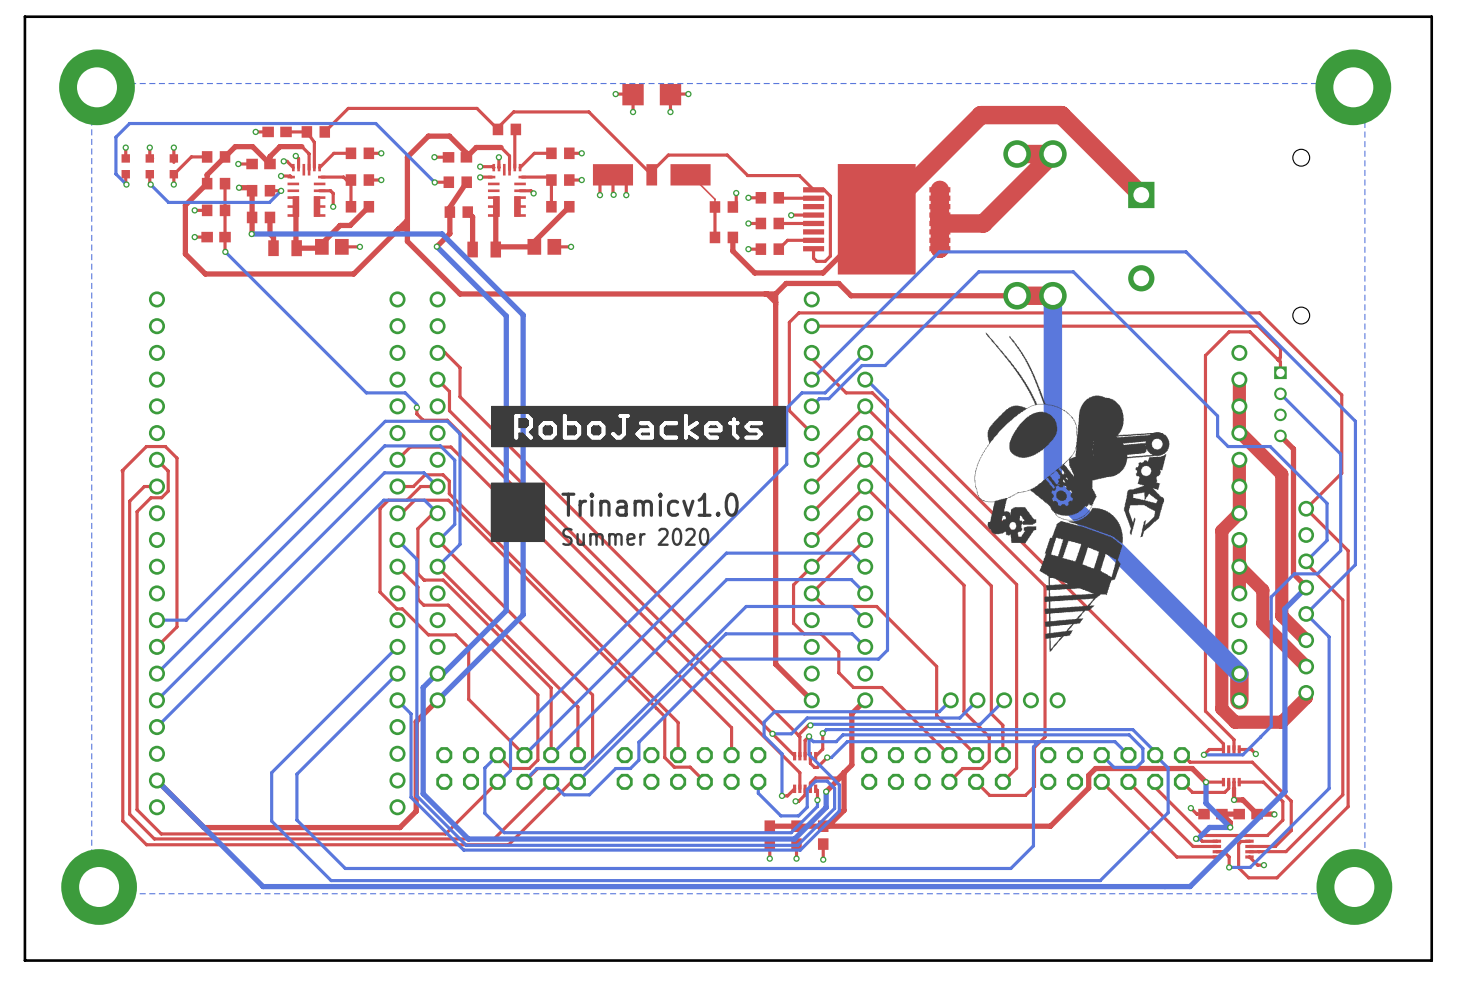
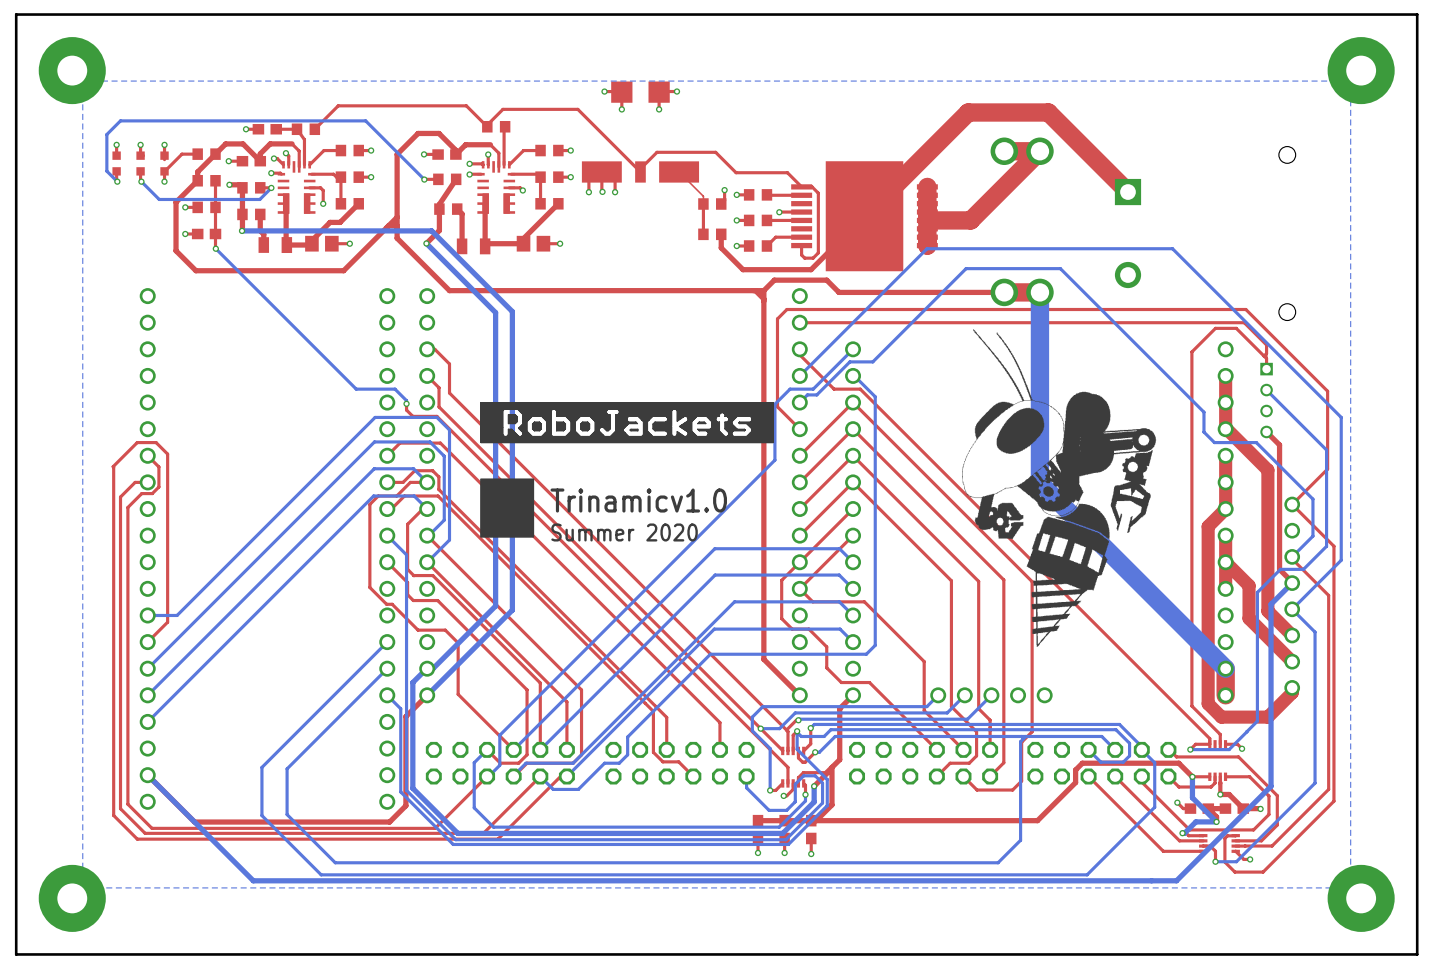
via: none -> (72, 70)
via: none -> (1361, 70)
via: (96, 87) -> none
via: (1353, 87) -> none
via: (99, 887) -> none
via: (1354, 887) -> none
via: none -> (72, 898)
via: none -> (1361, 898)

